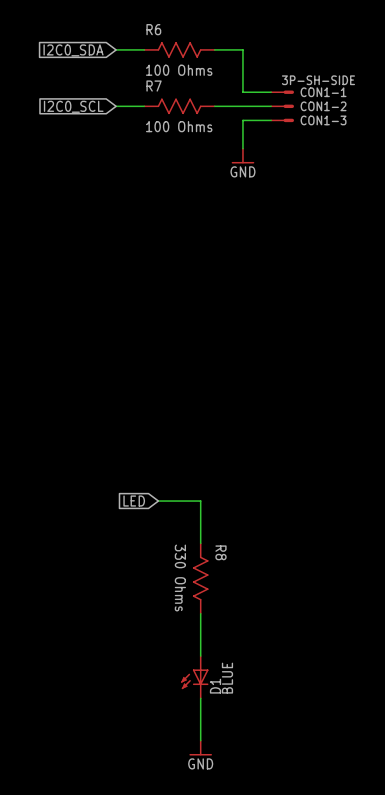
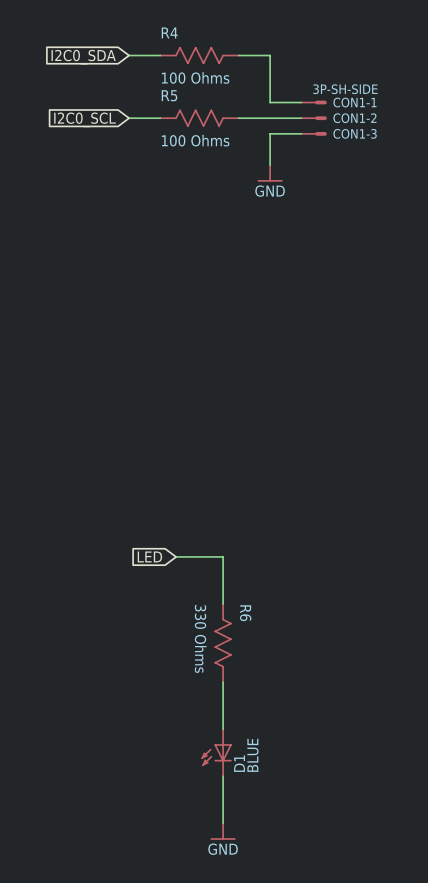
R6 name: R6 (153, 29) -> R4 (169, 32)
R7 name: R7 (154, 86) -> R5 (169, 95)
R8 name: R8 (220, 552) -> R6 (245, 613)

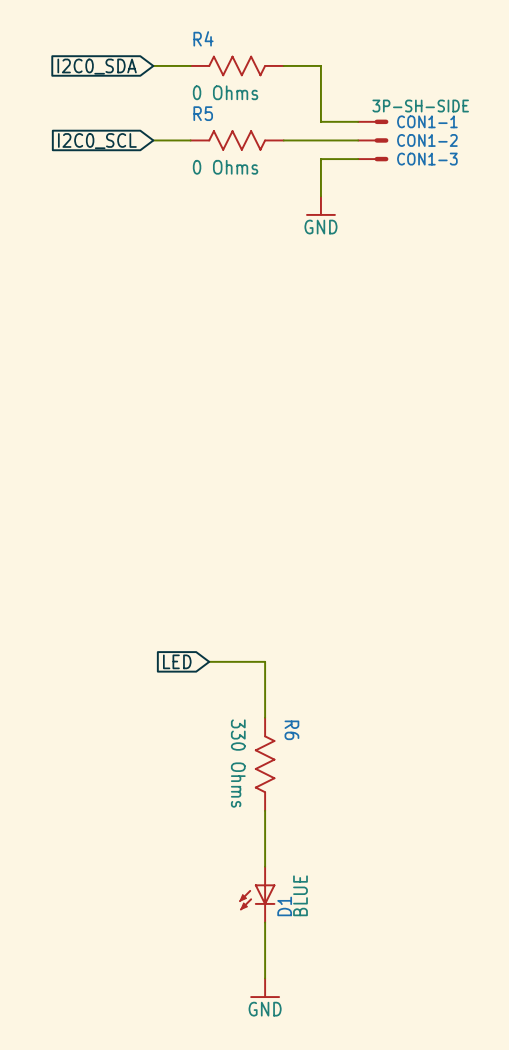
R4 value: 100 Ohms (195, 77) -> 0 Ohms (225, 92)
R5 value: 100 Ohms (195, 140) -> 0 Ohms (225, 167)

